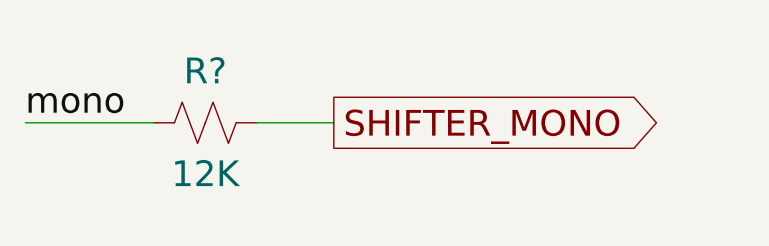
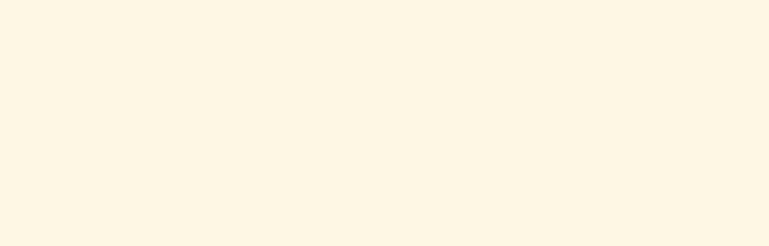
label: mono (75, 103) -> none
wire: (25, 122) (153, 122) -> none
R?: 12K (205, 122) -> none
wire: (256, 122) (333, 122) -> none
global label: SHIFTER_MONO (482, 126) -> none

